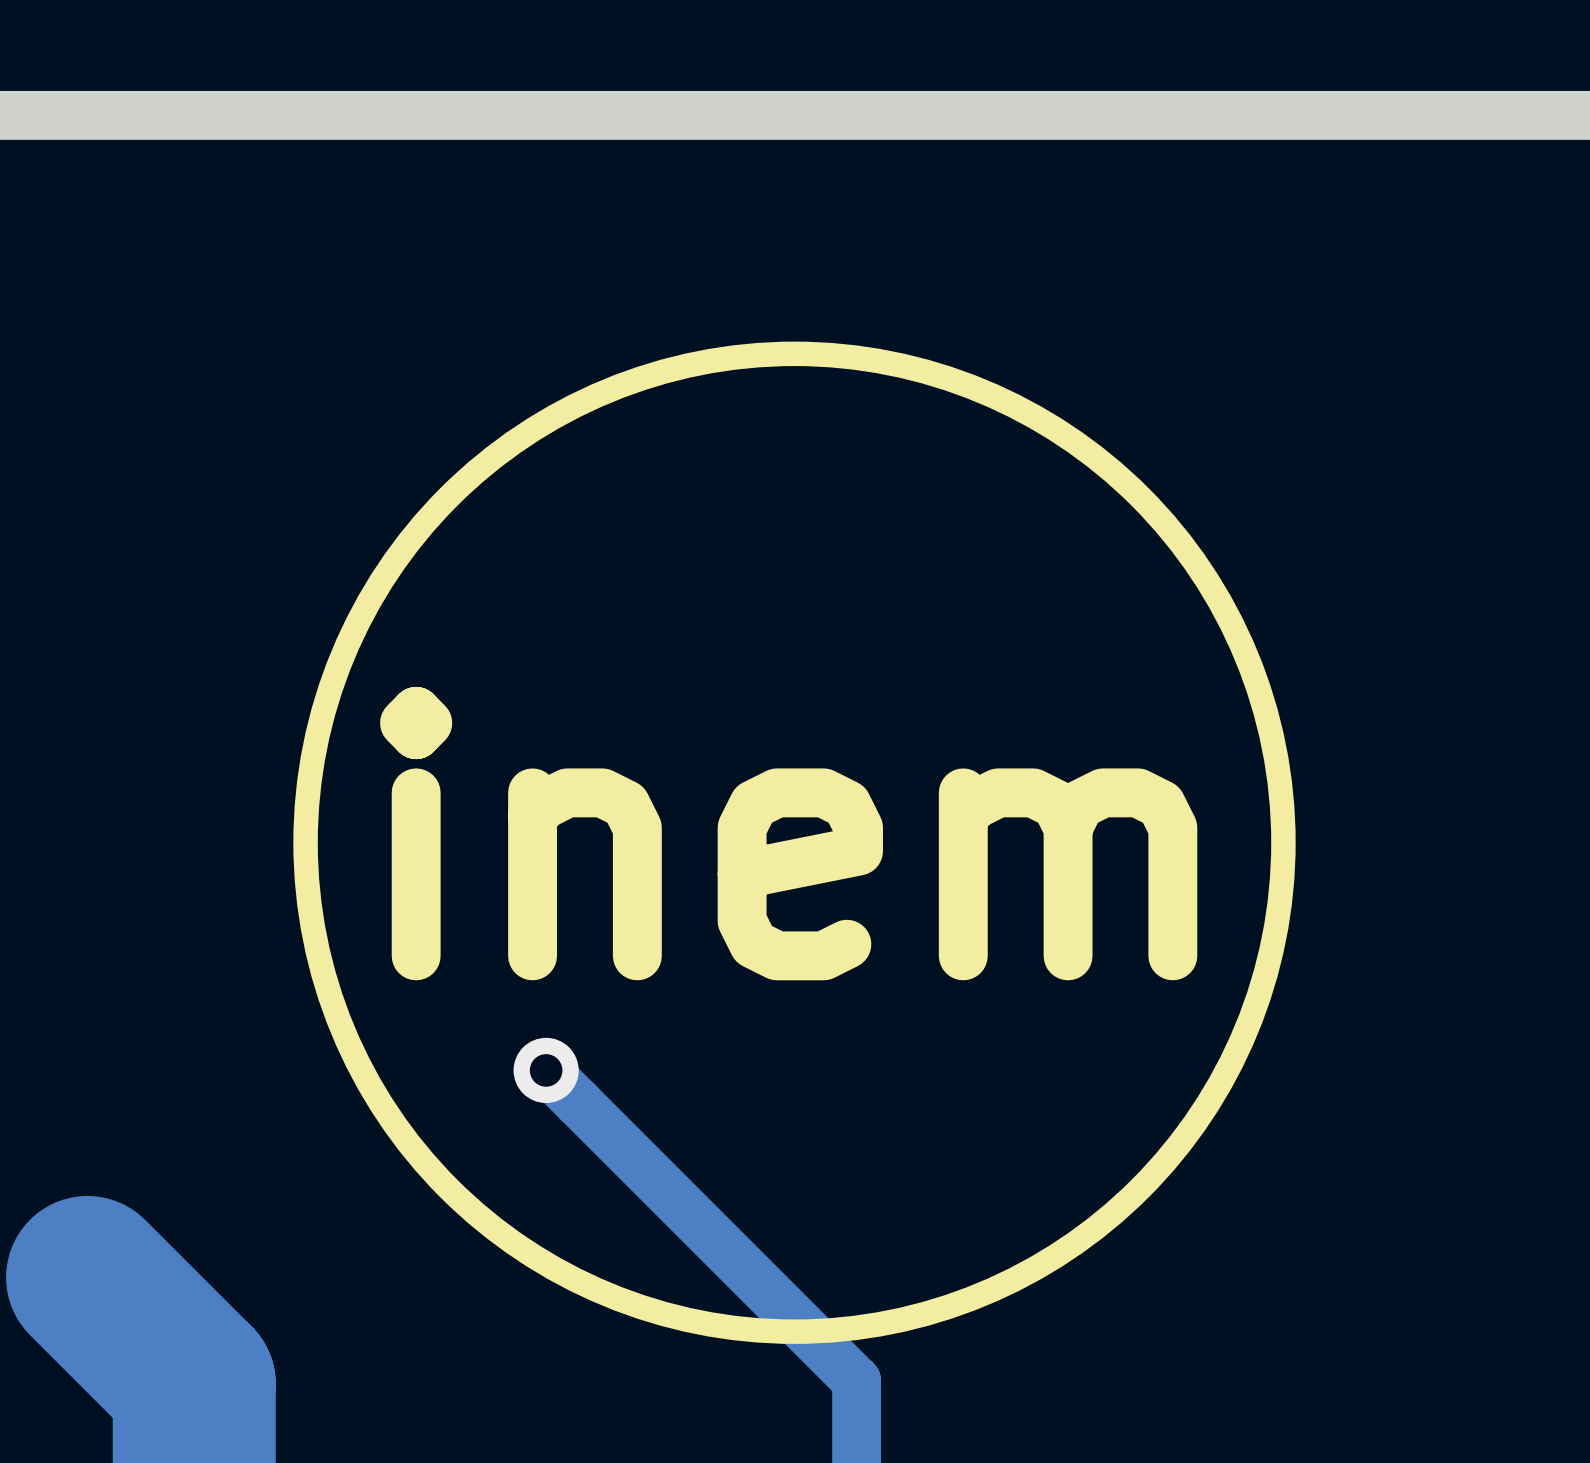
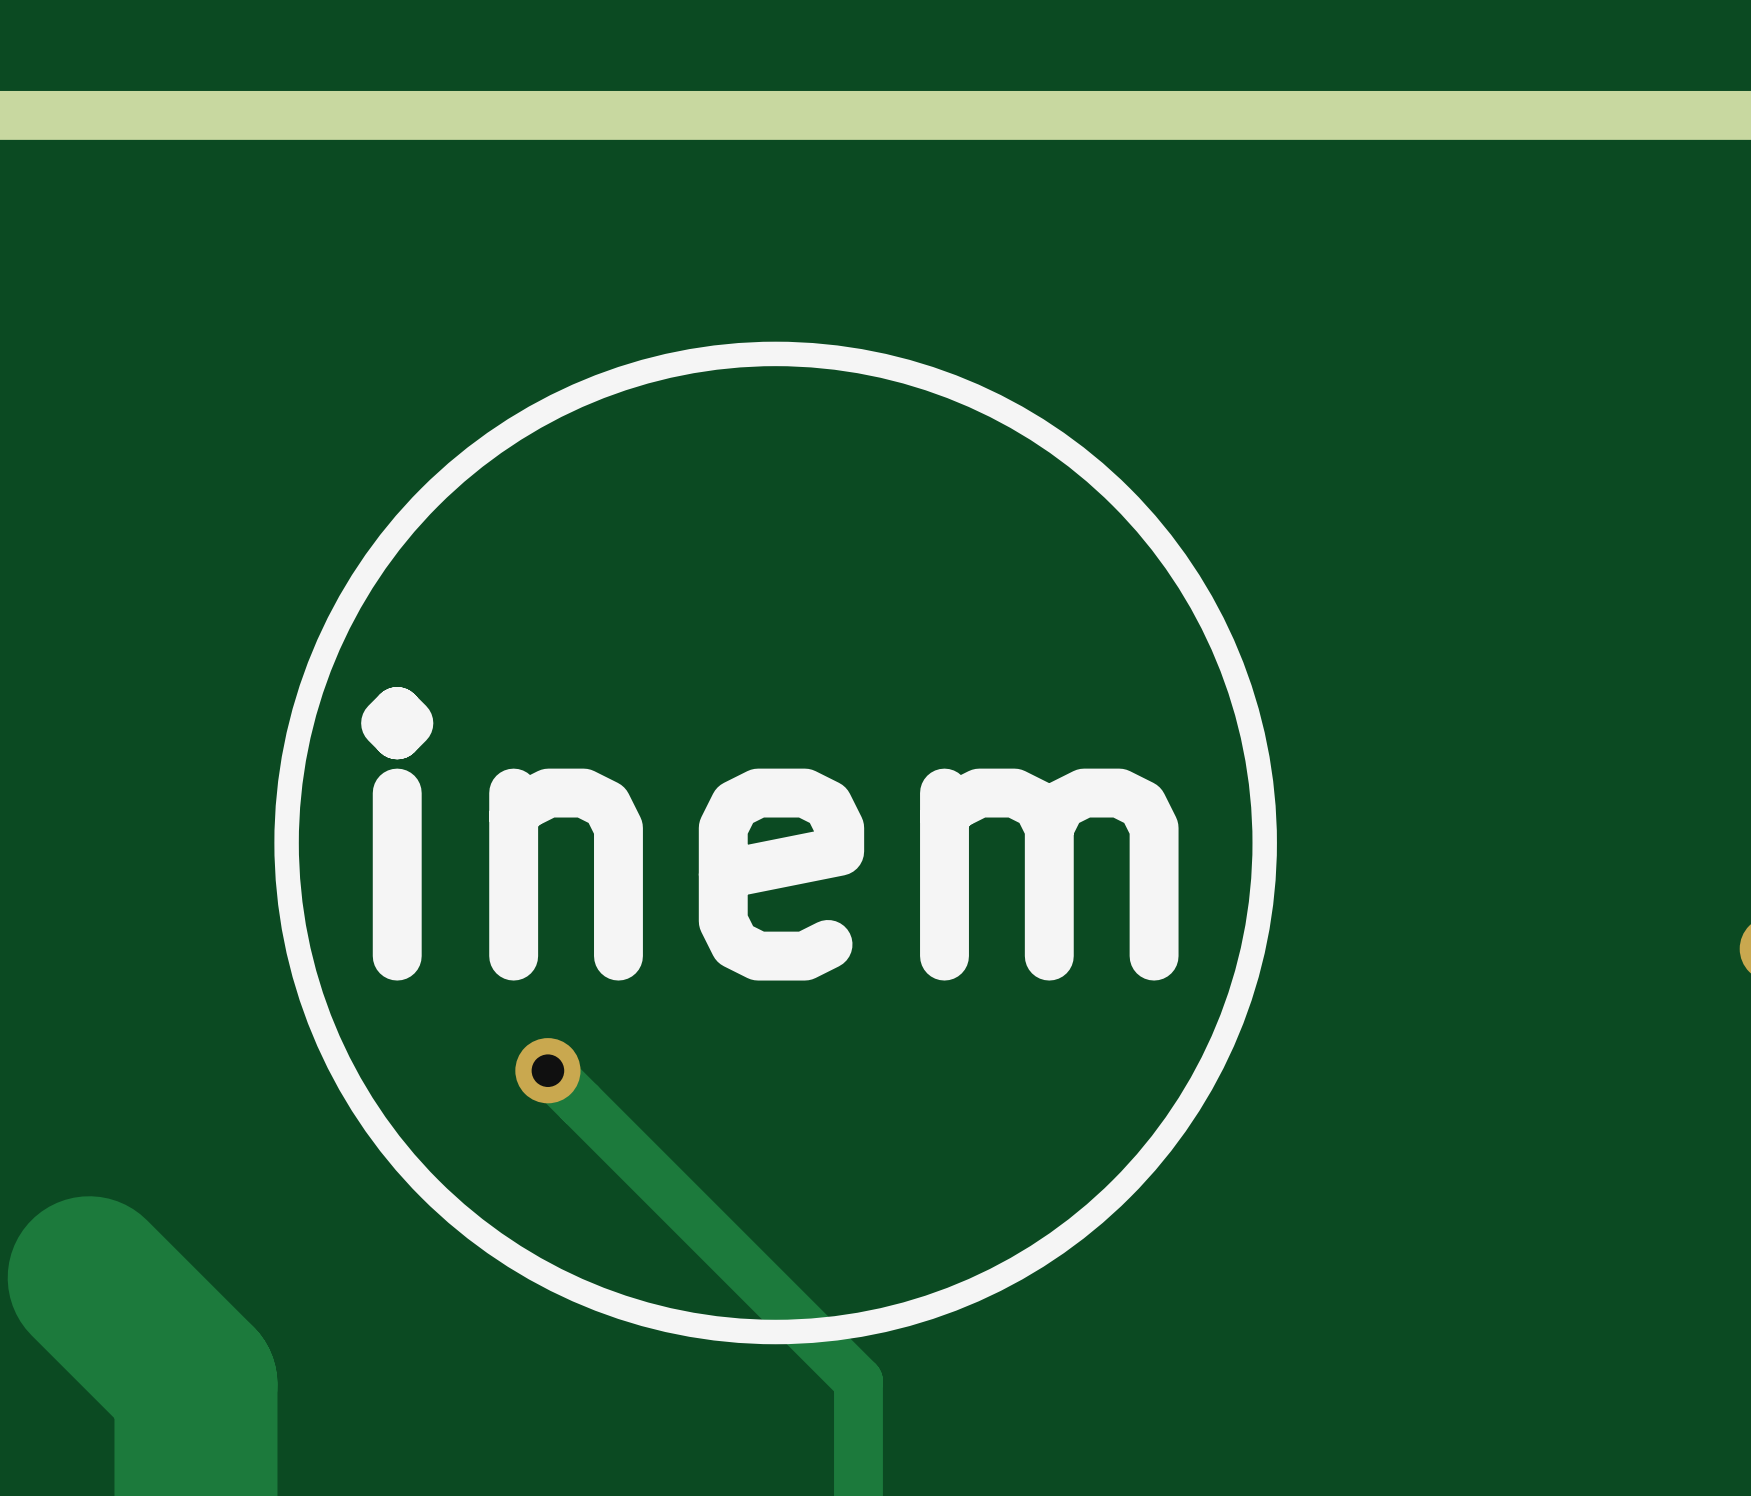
drawing position: (794, 842) -> (775, 842)

